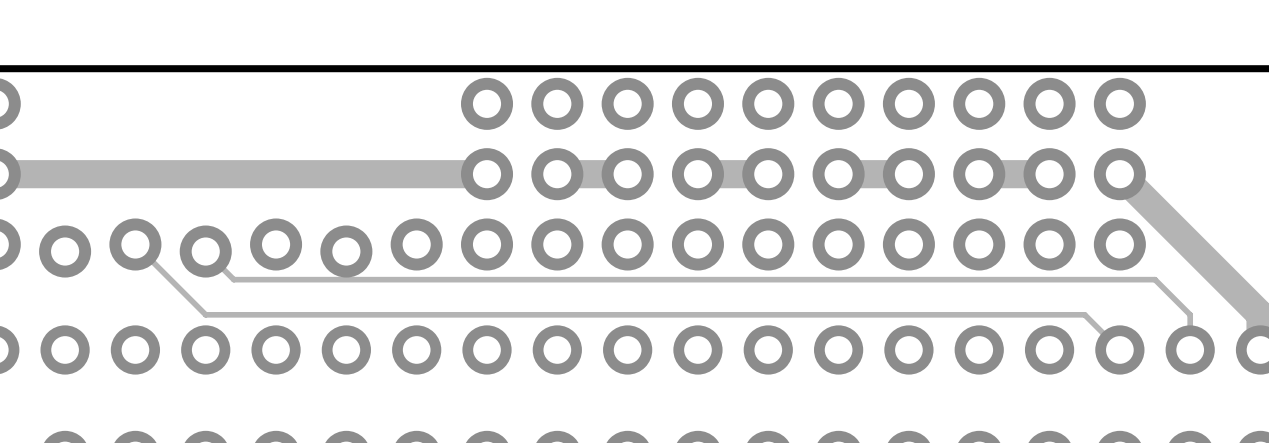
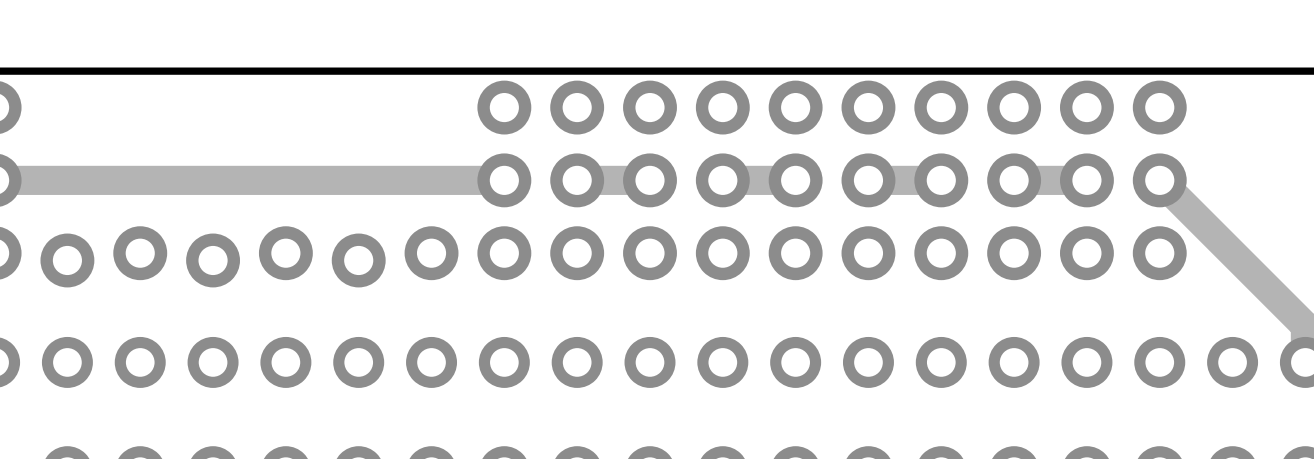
track: (135, 244) (205, 314) (1084, 314) (1119, 349) -> none
track: (205, 251) (233, 279) (1155, 279) (1190, 314) (1190, 349) -> none

